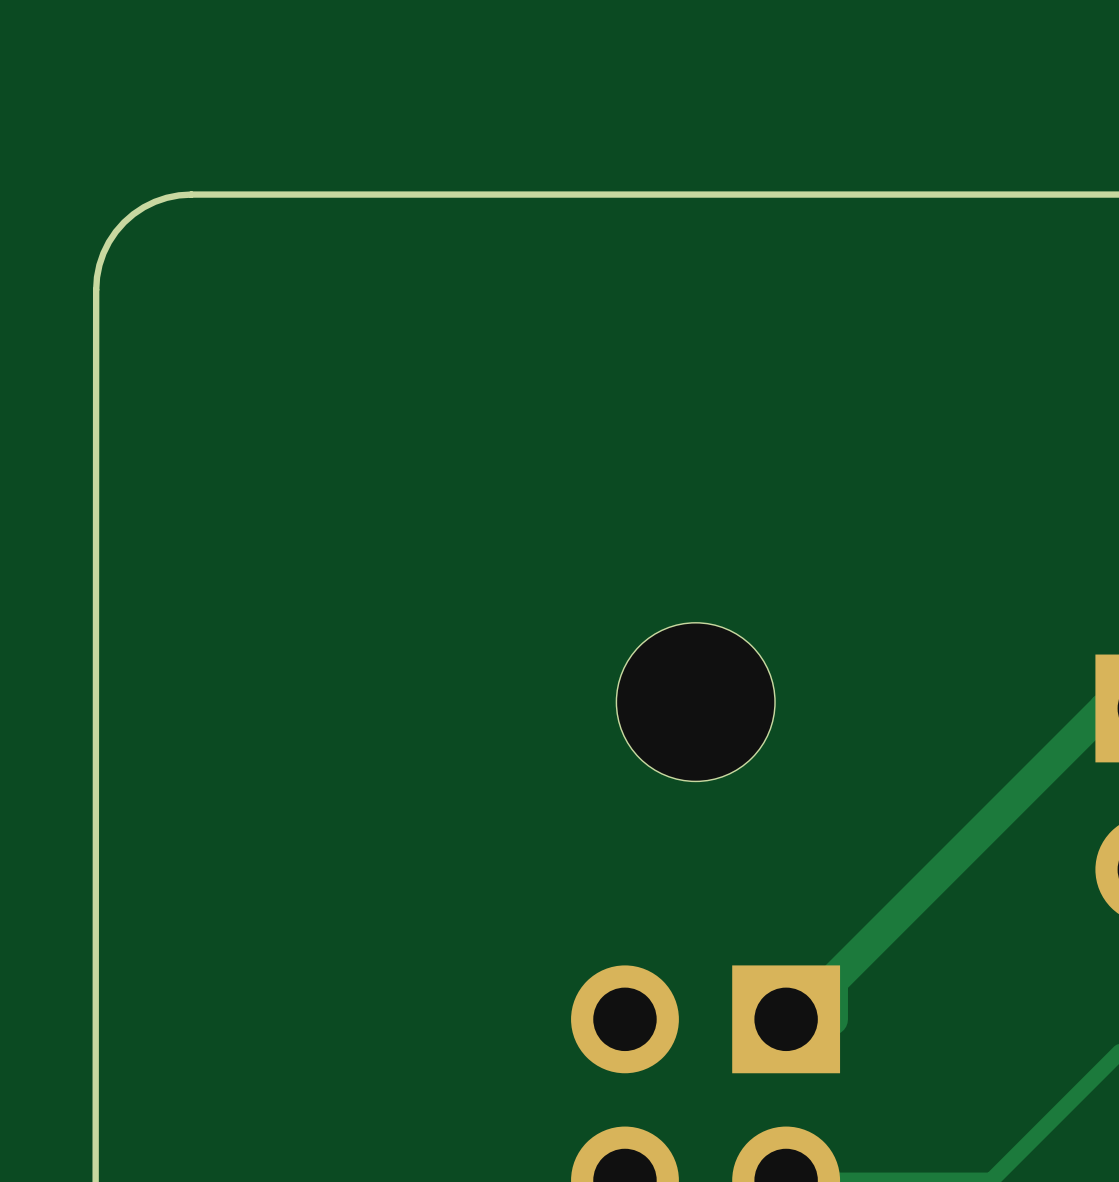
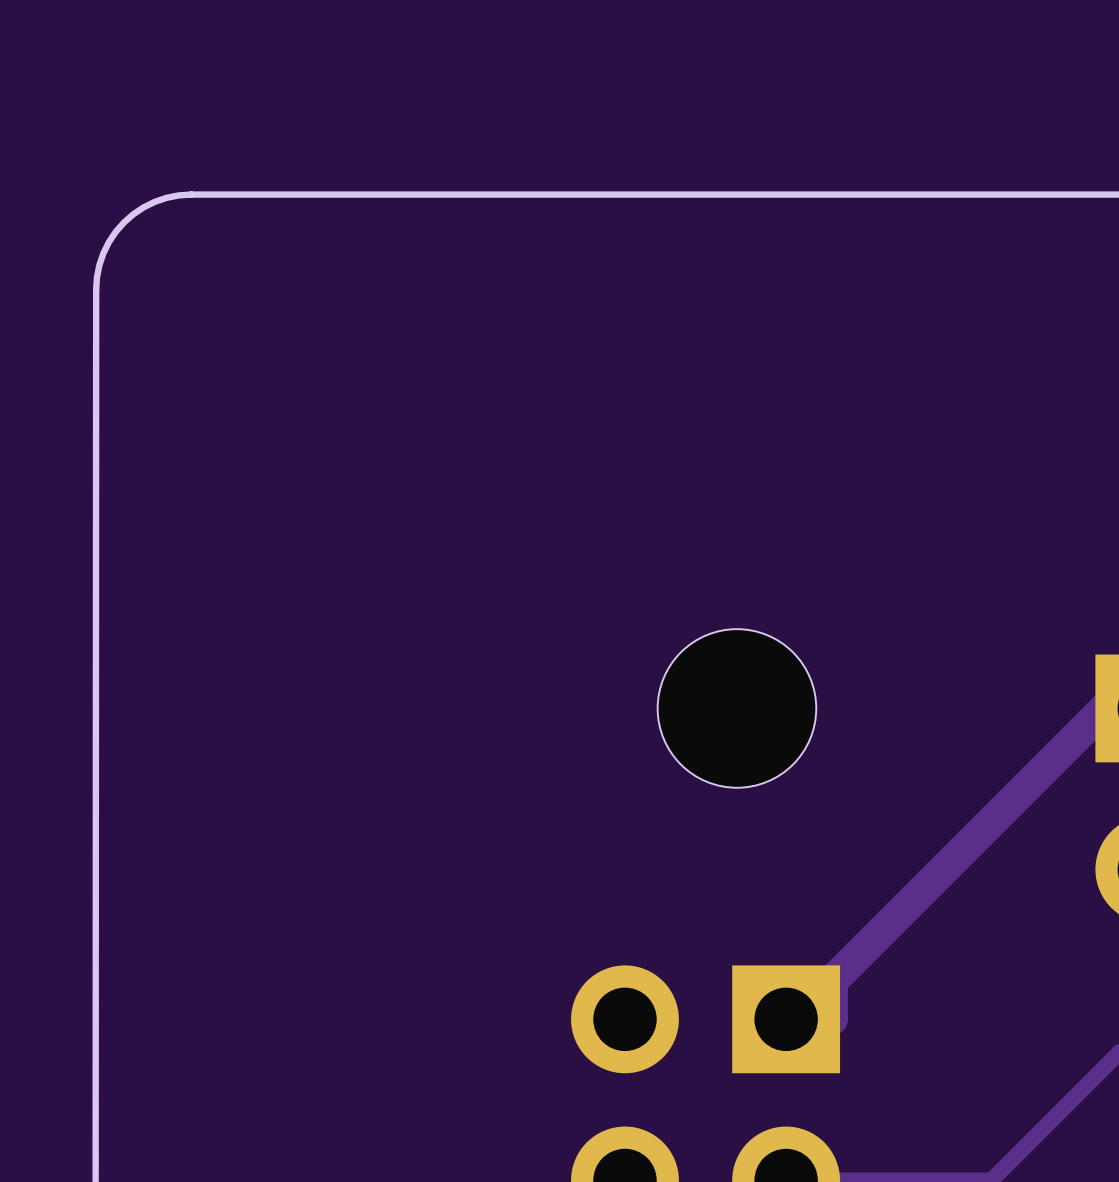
part position: (695, 702) -> (736, 708)

